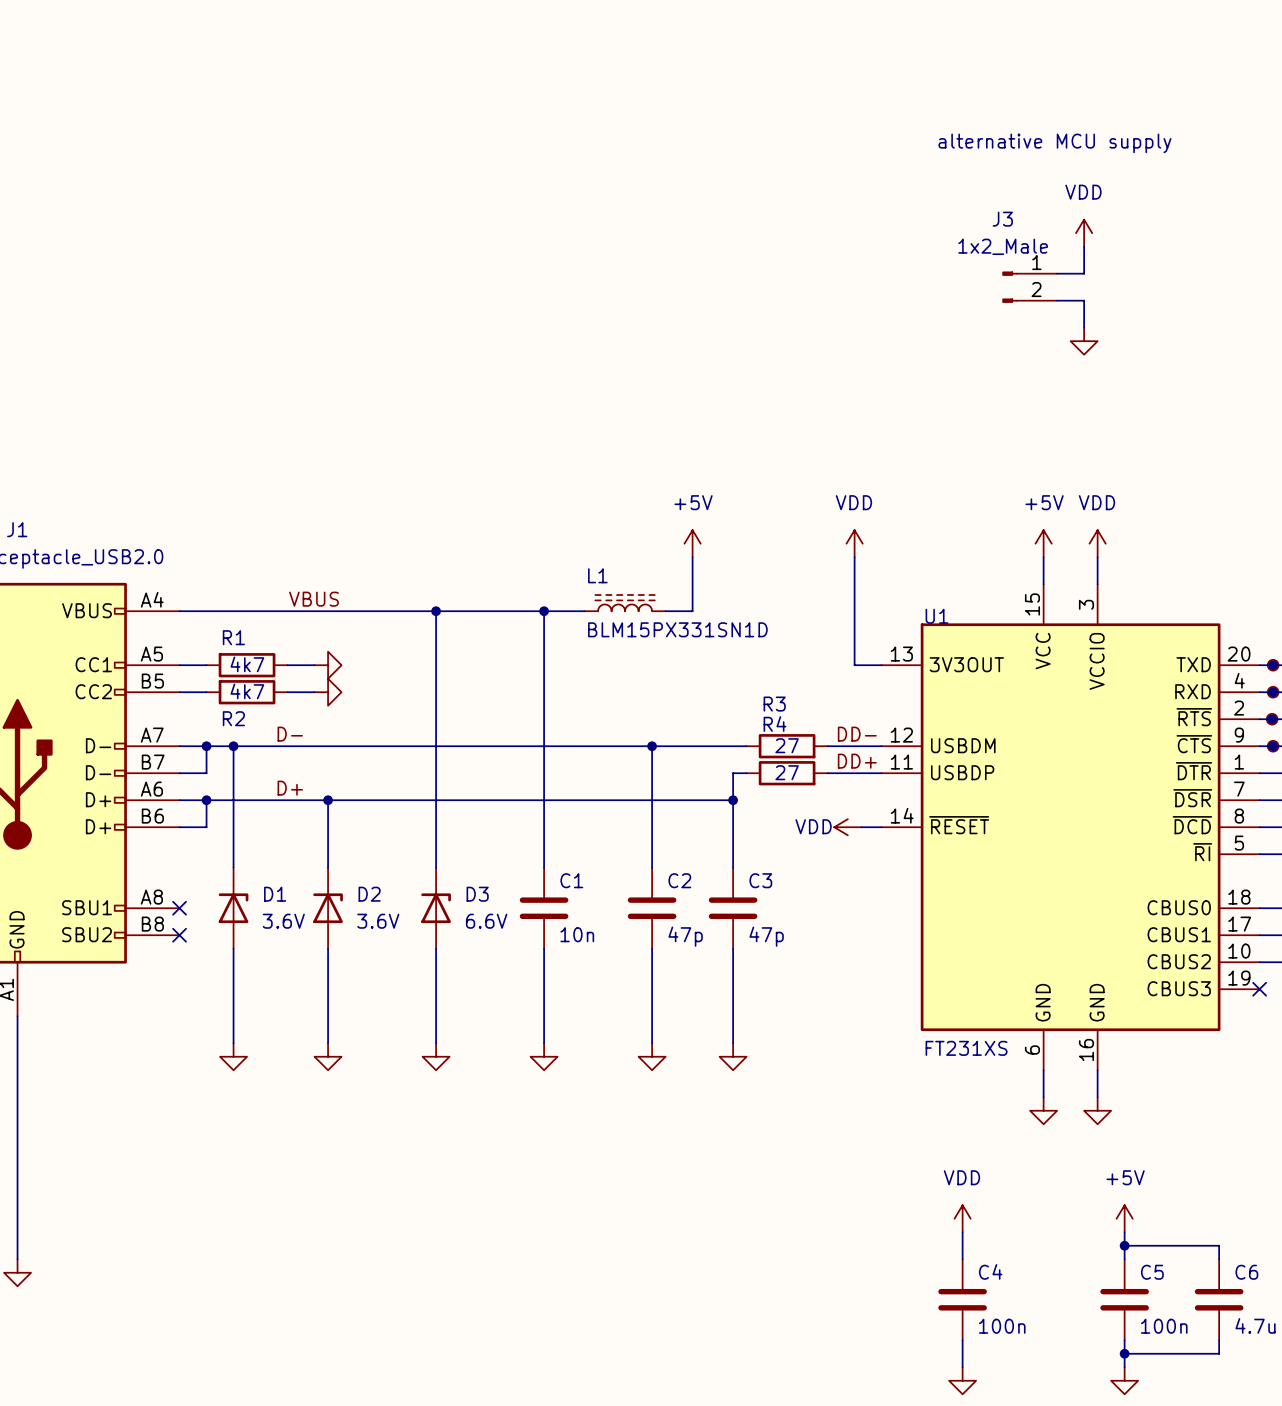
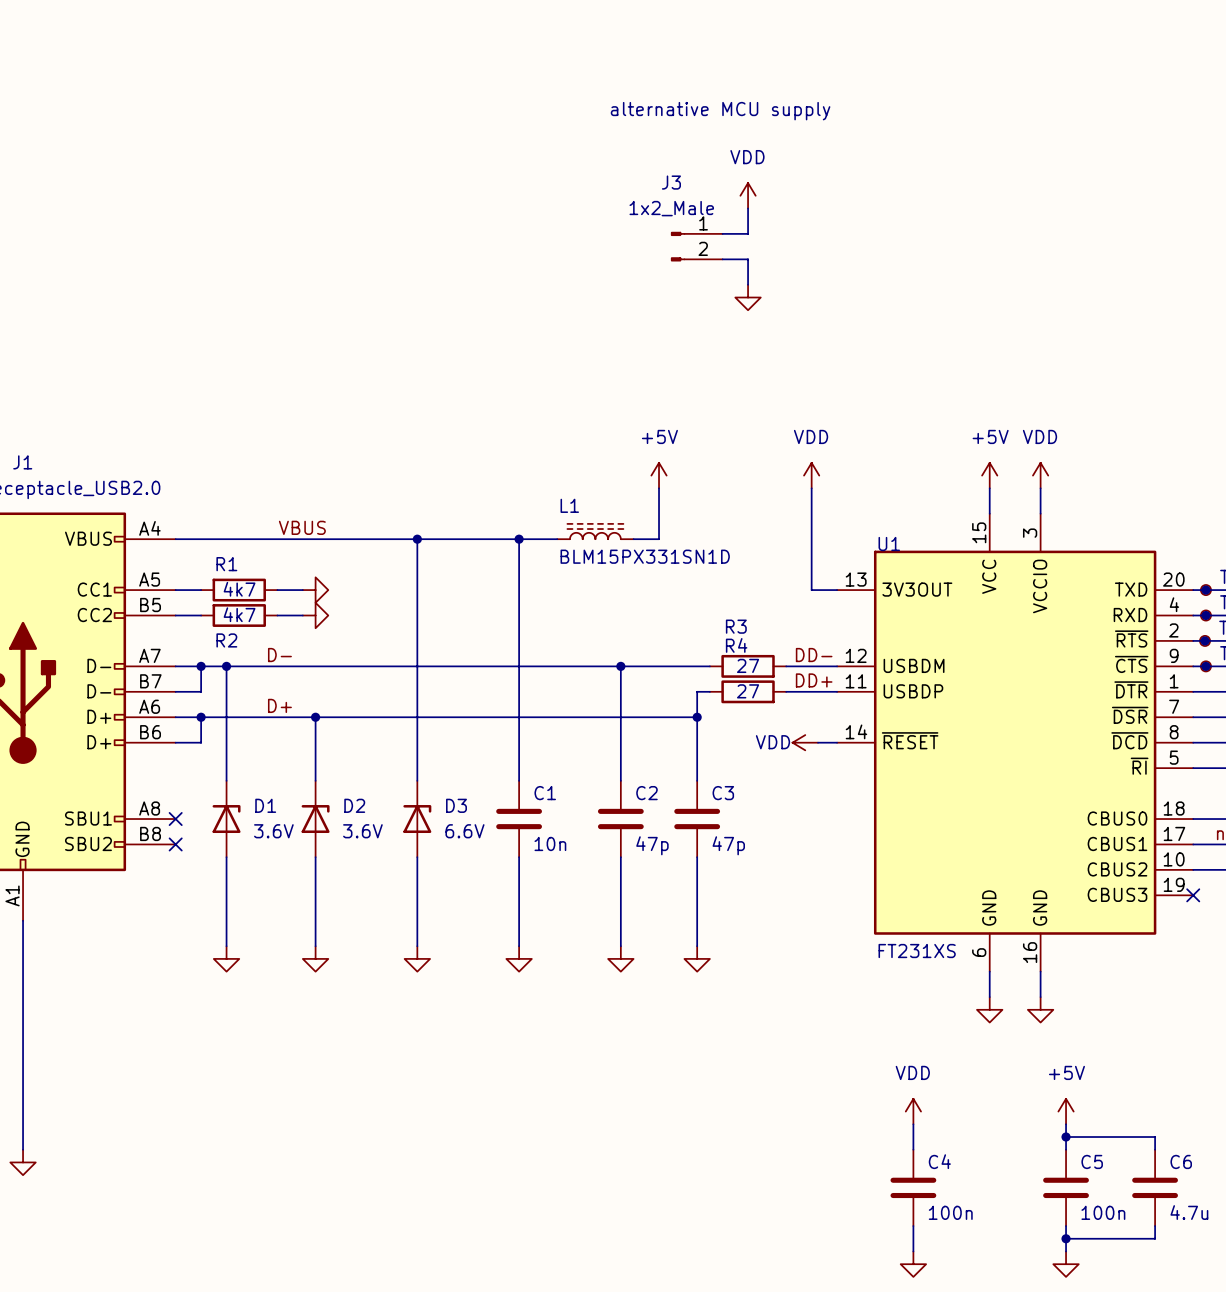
text: alternative MCU supply (1054, 143) -> none
text: none -> alternative MCU supply (720, 111)
power symbol: VDD (1084, 233) -> none
power symbol: none -> VDD (748, 195)
wire: (1084, 246) (1084, 273) (1057, 273) -> none
wire: none -> (748, 208) (748, 233) (722, 233)
J3 position: (1029, 287) -> (696, 246)
wire: (1057, 300) (1084, 300) (1084, 327) -> none
wire: none -> (722, 259) (748, 259) (748, 284)
power symbol: (1084, 341) -> none
power symbol: none -> (748, 297)

